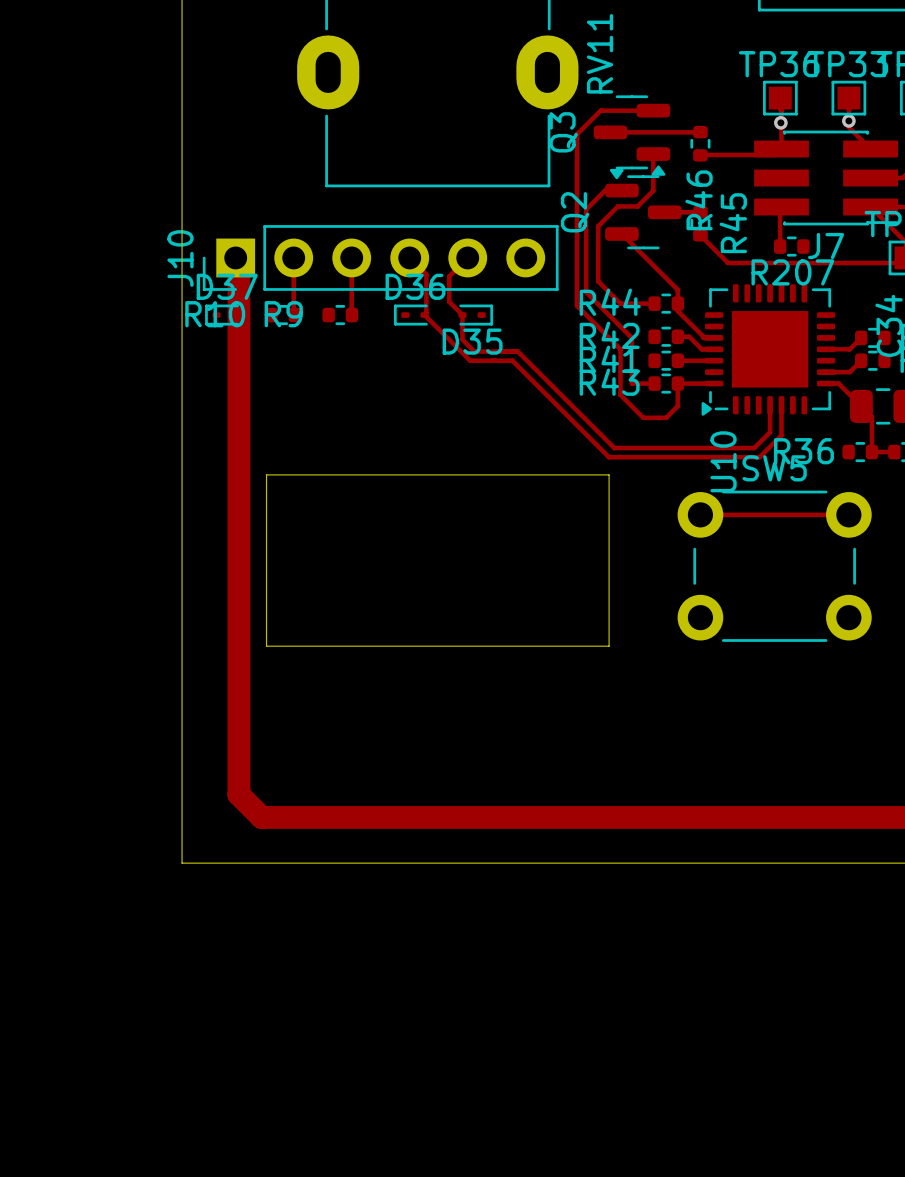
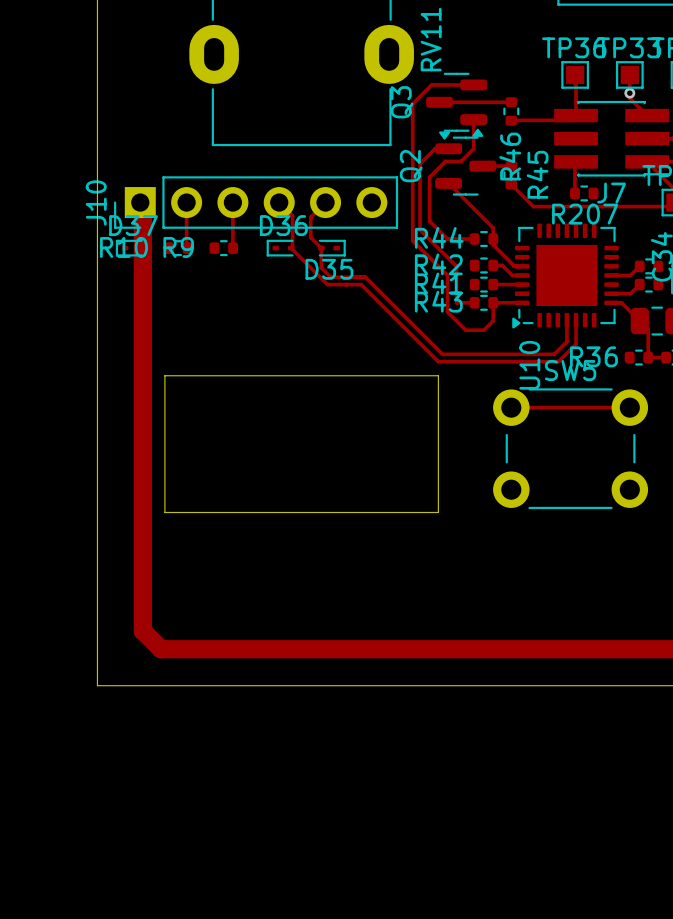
via: (780, 122) -> none

